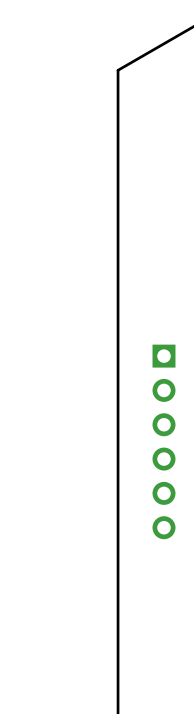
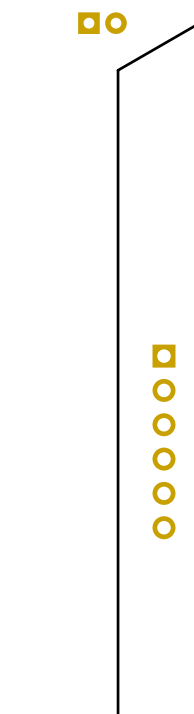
part: none -> (102, 23)

